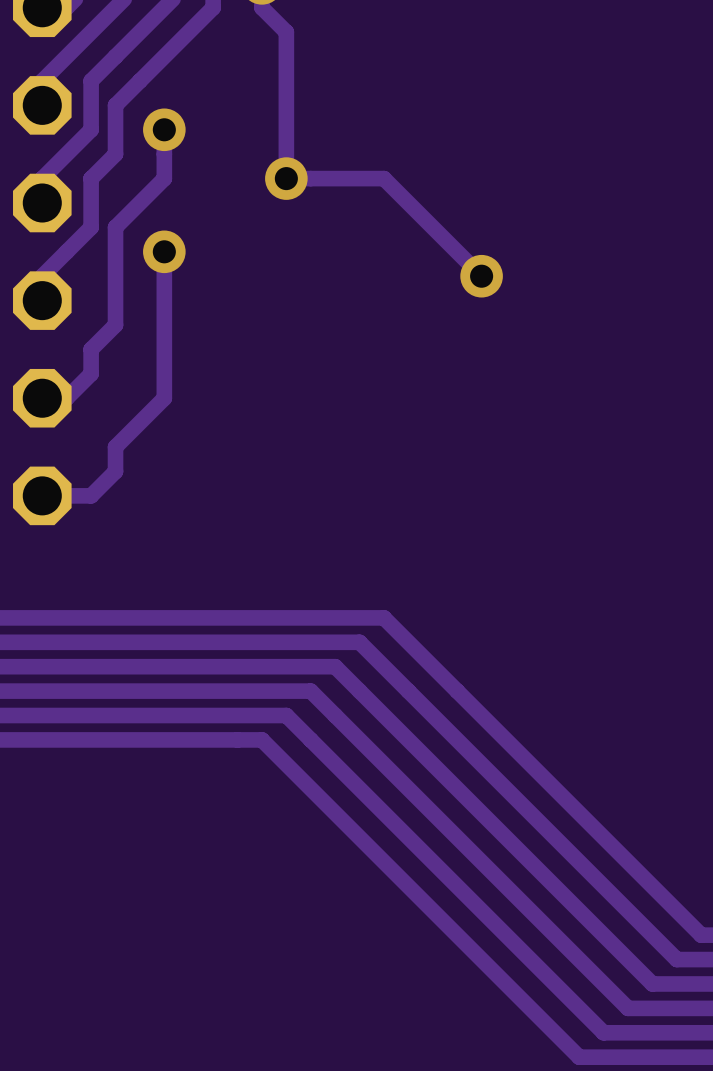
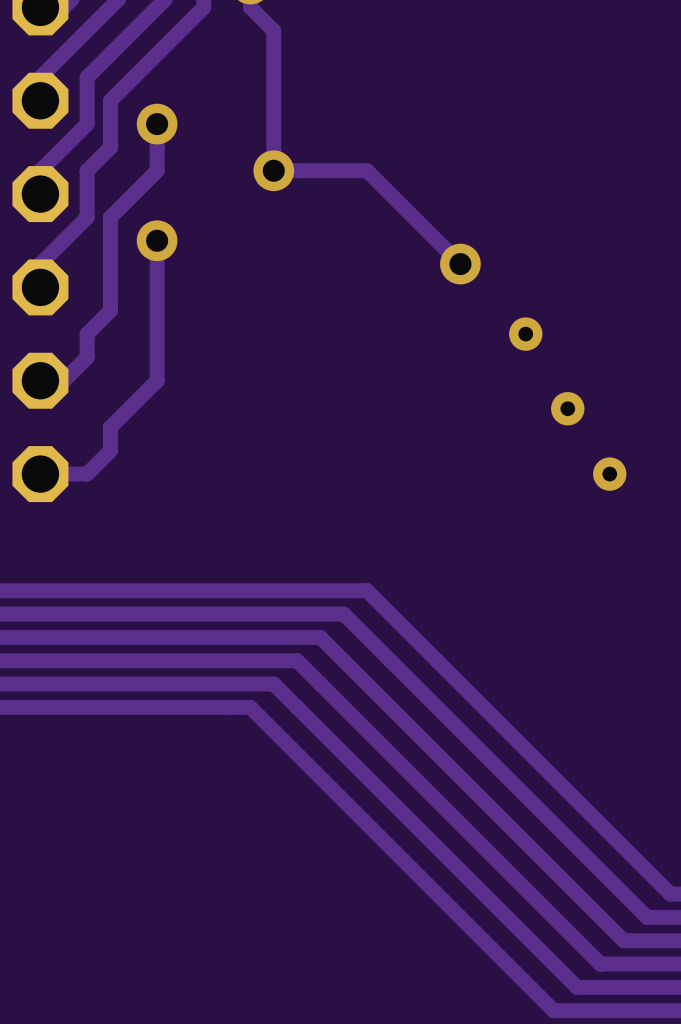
via: none -> (525, 334)
via: none -> (567, 408)
via: none -> (609, 474)

